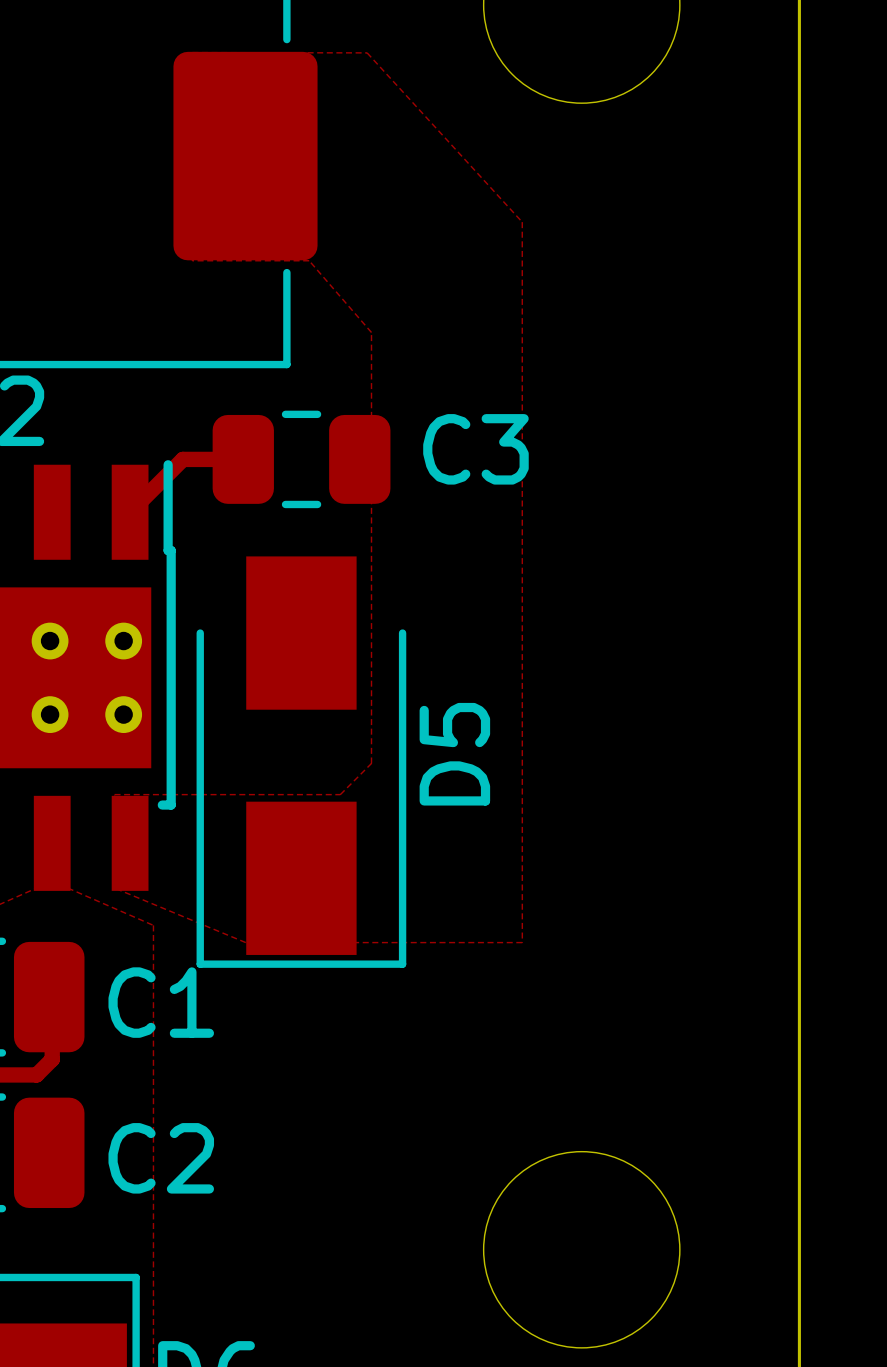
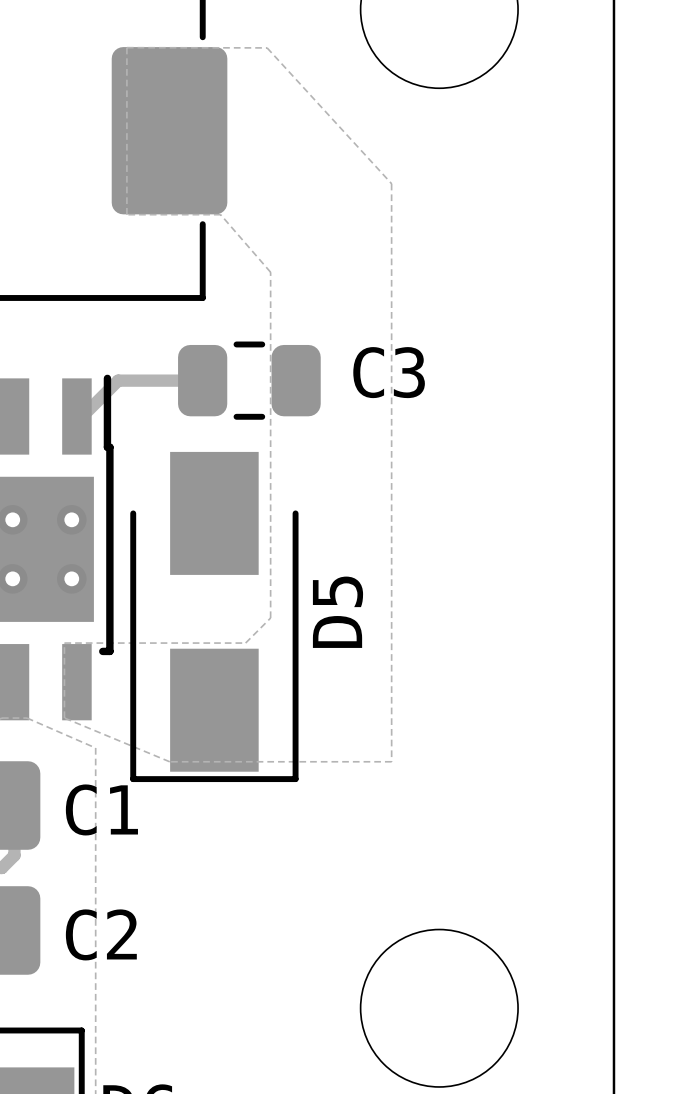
track: (243, 459) (182, 459) (130, 512) -> none
C3 position: (301, 459) -> (249, 380)
track: none -> (202, 380) (118, 380) (82, 416)

